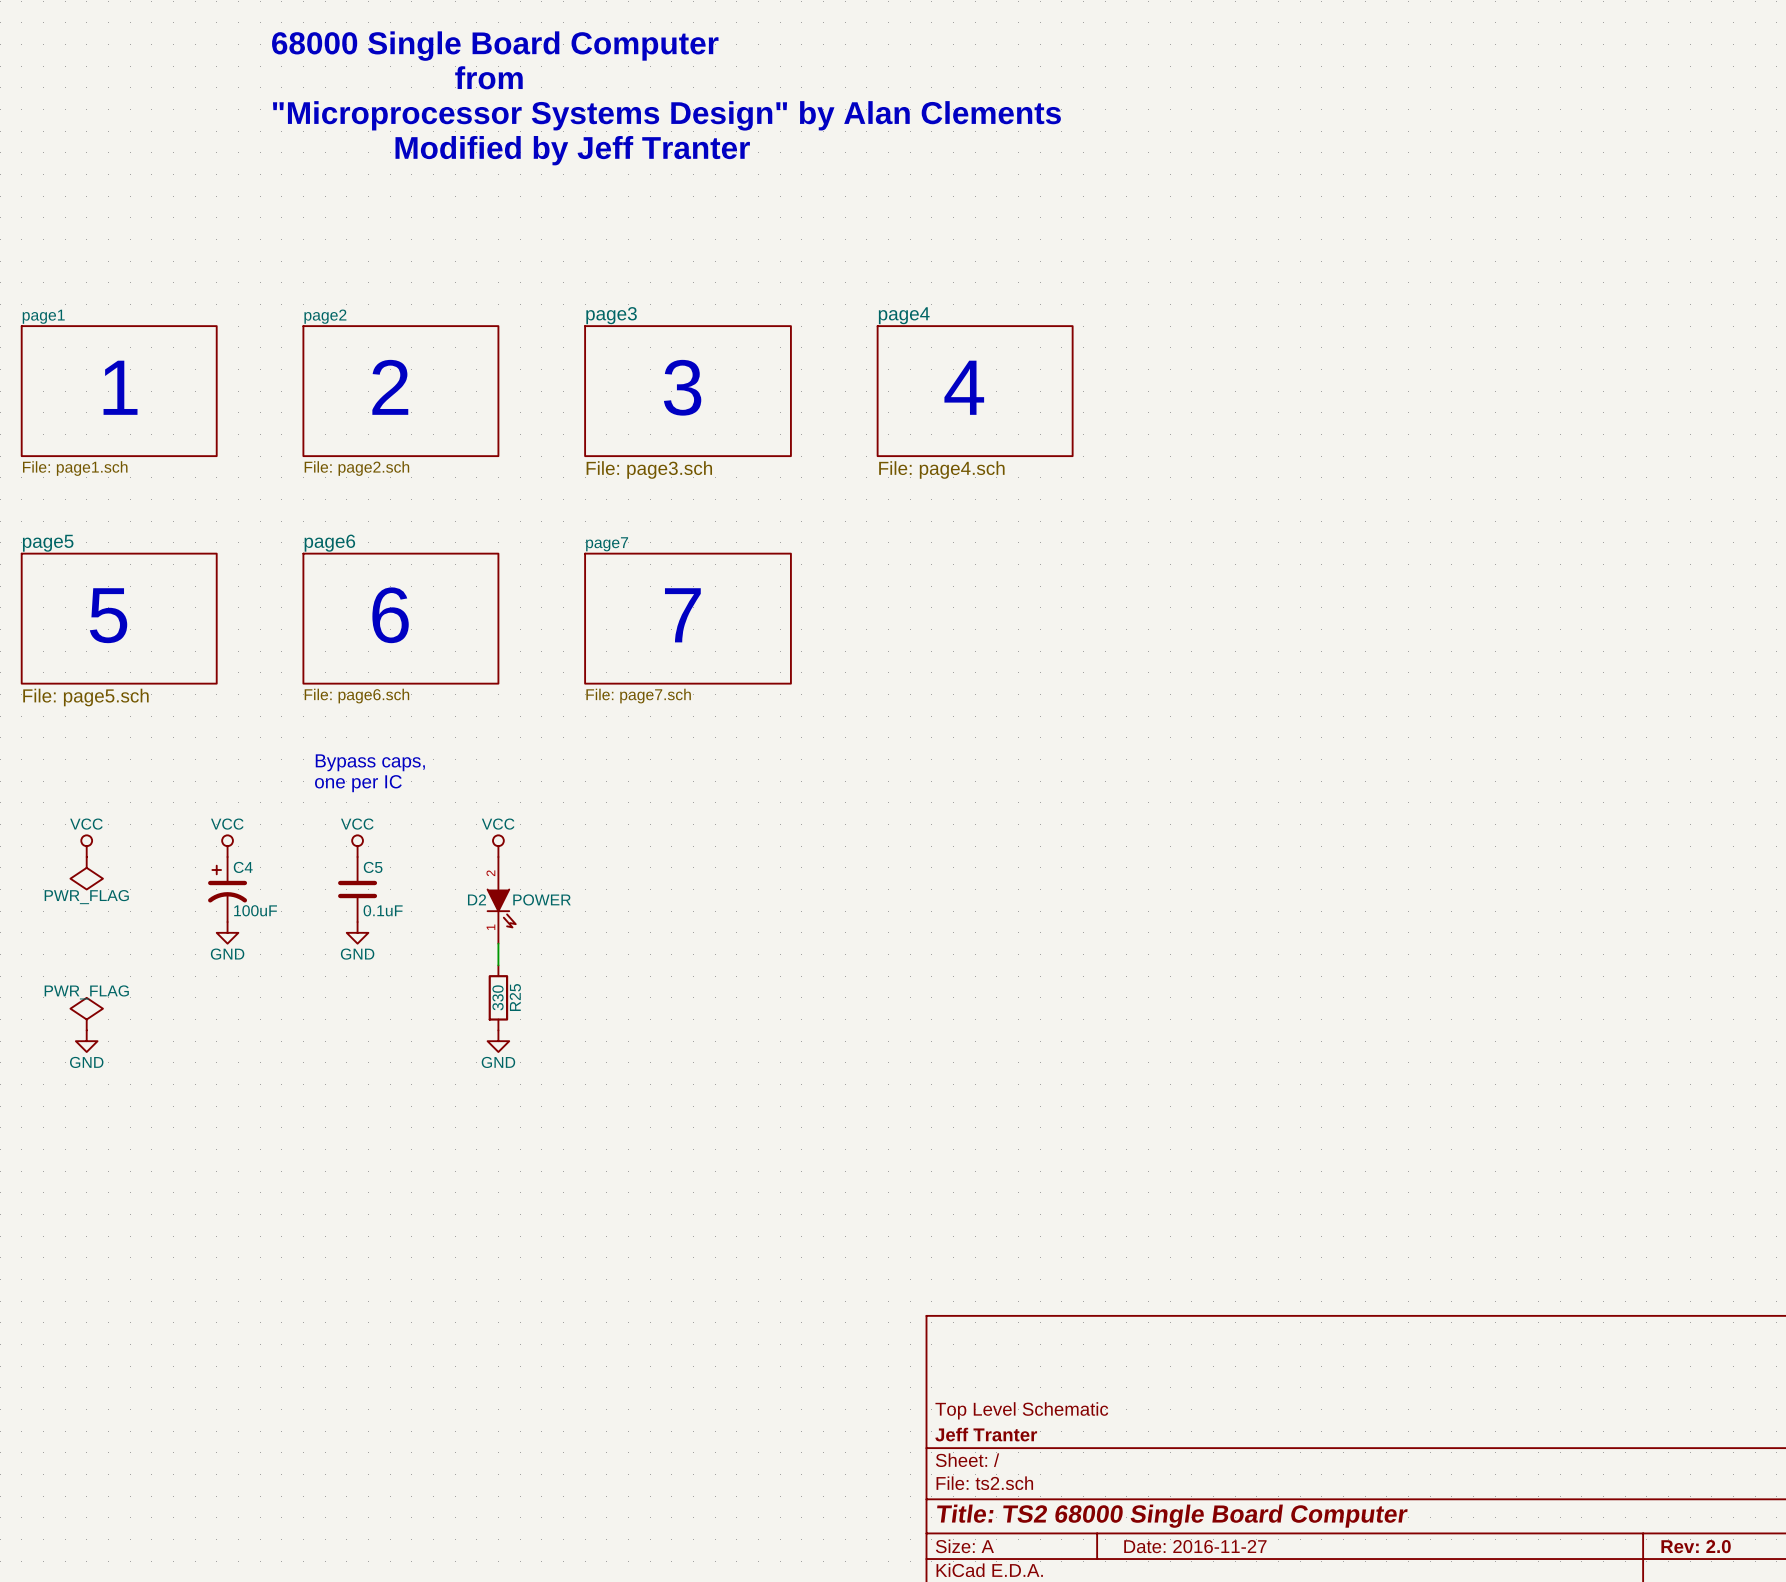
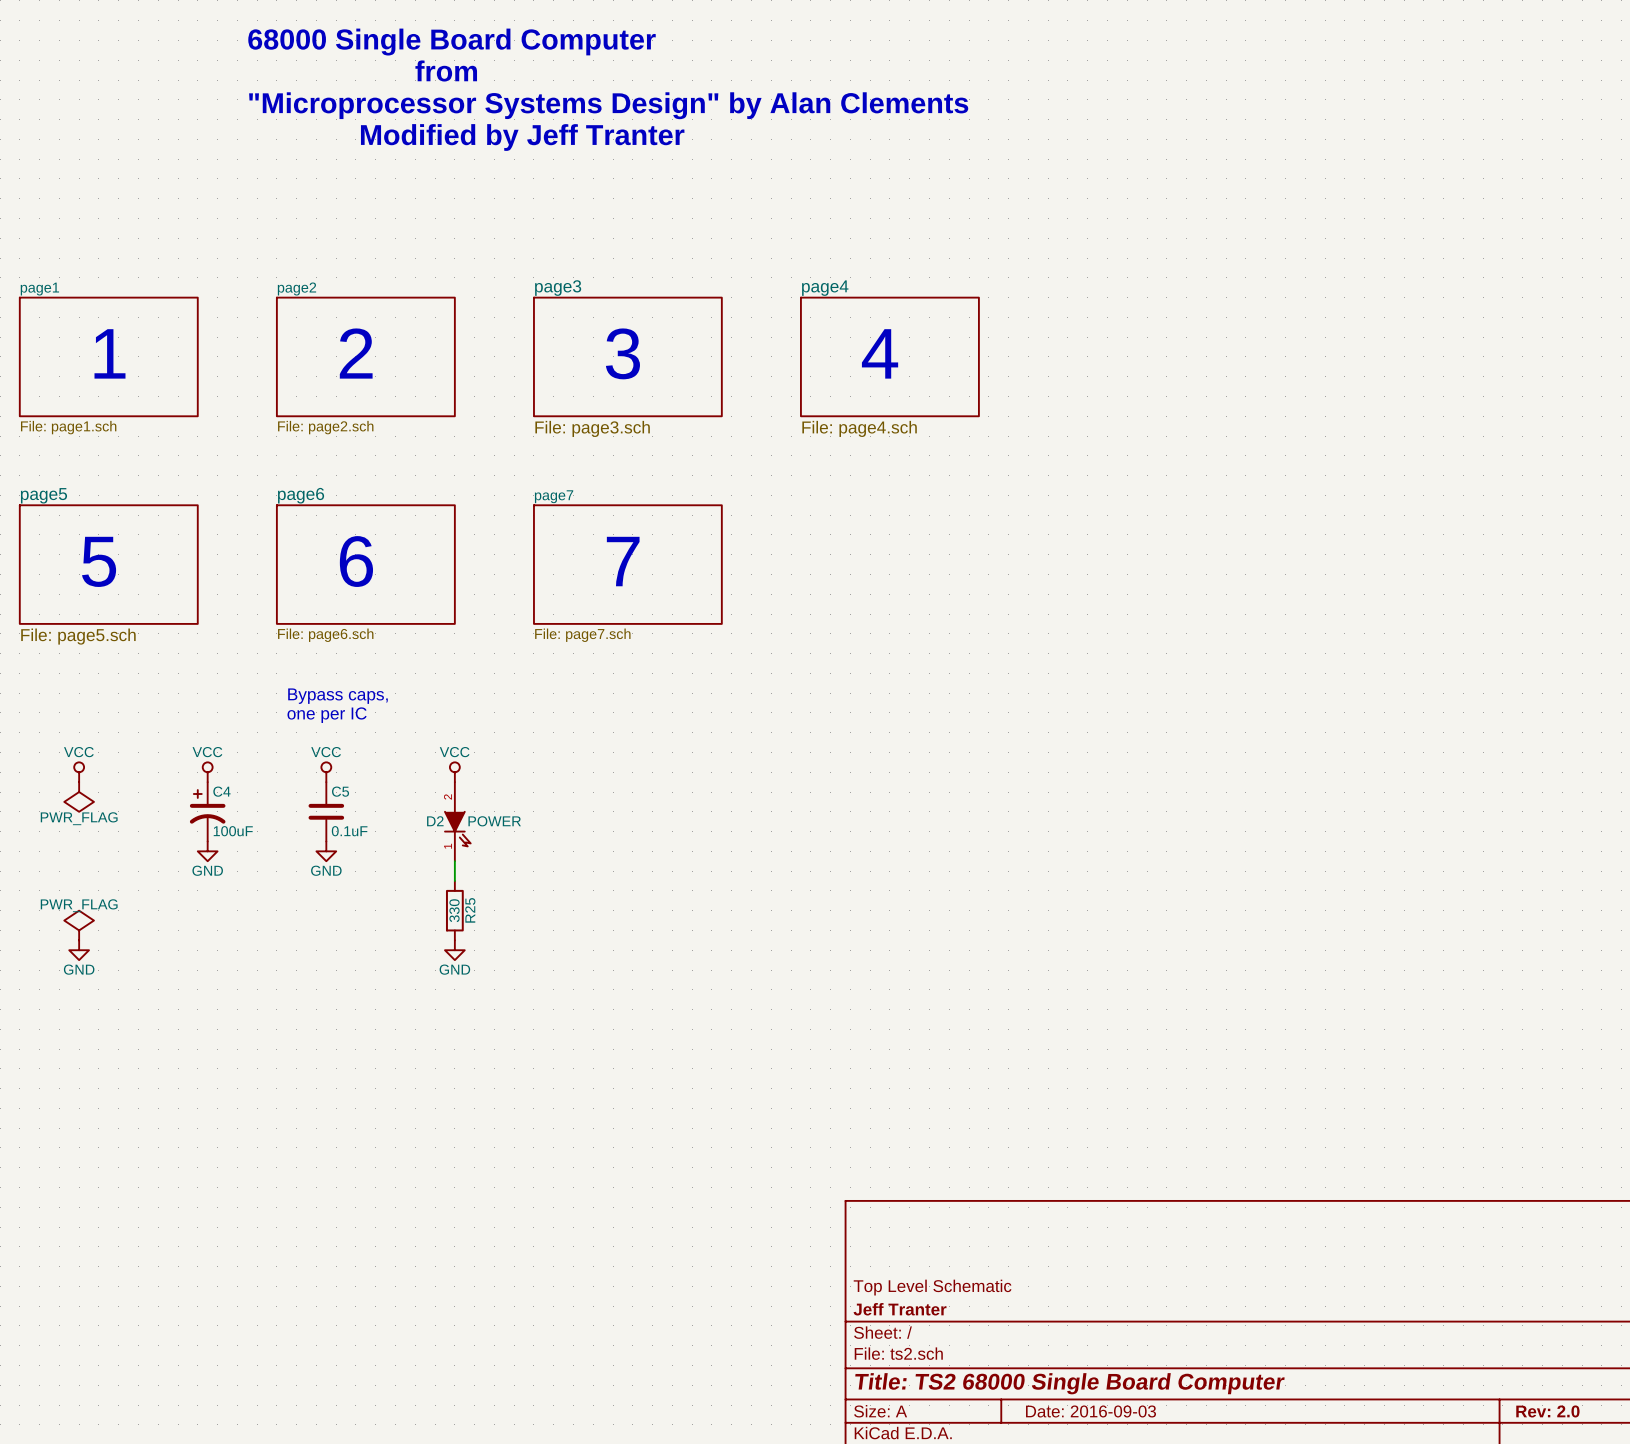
title block: Date: 2016-11-27 (1195, 1546) -> Date: 2016-09-03 (1091, 1411)

